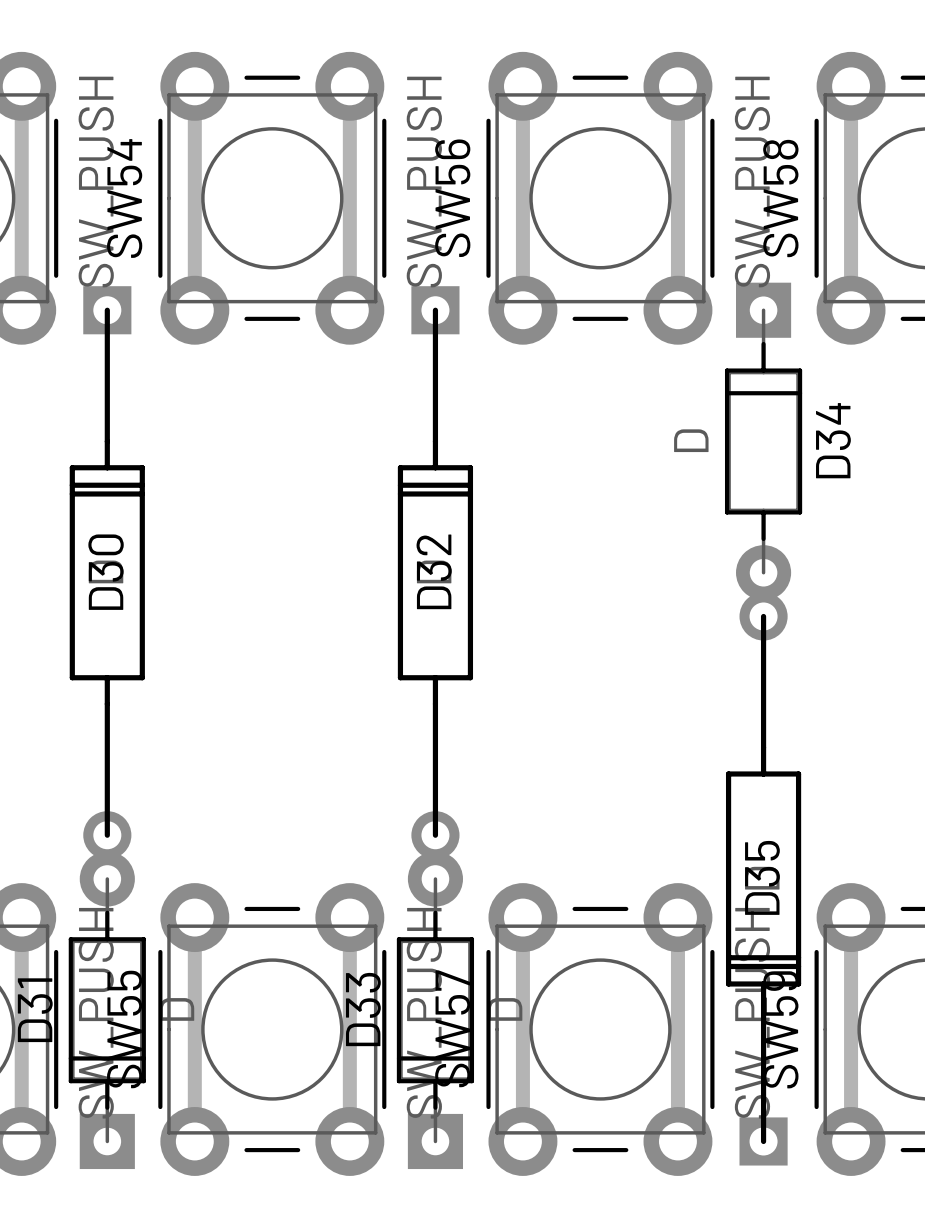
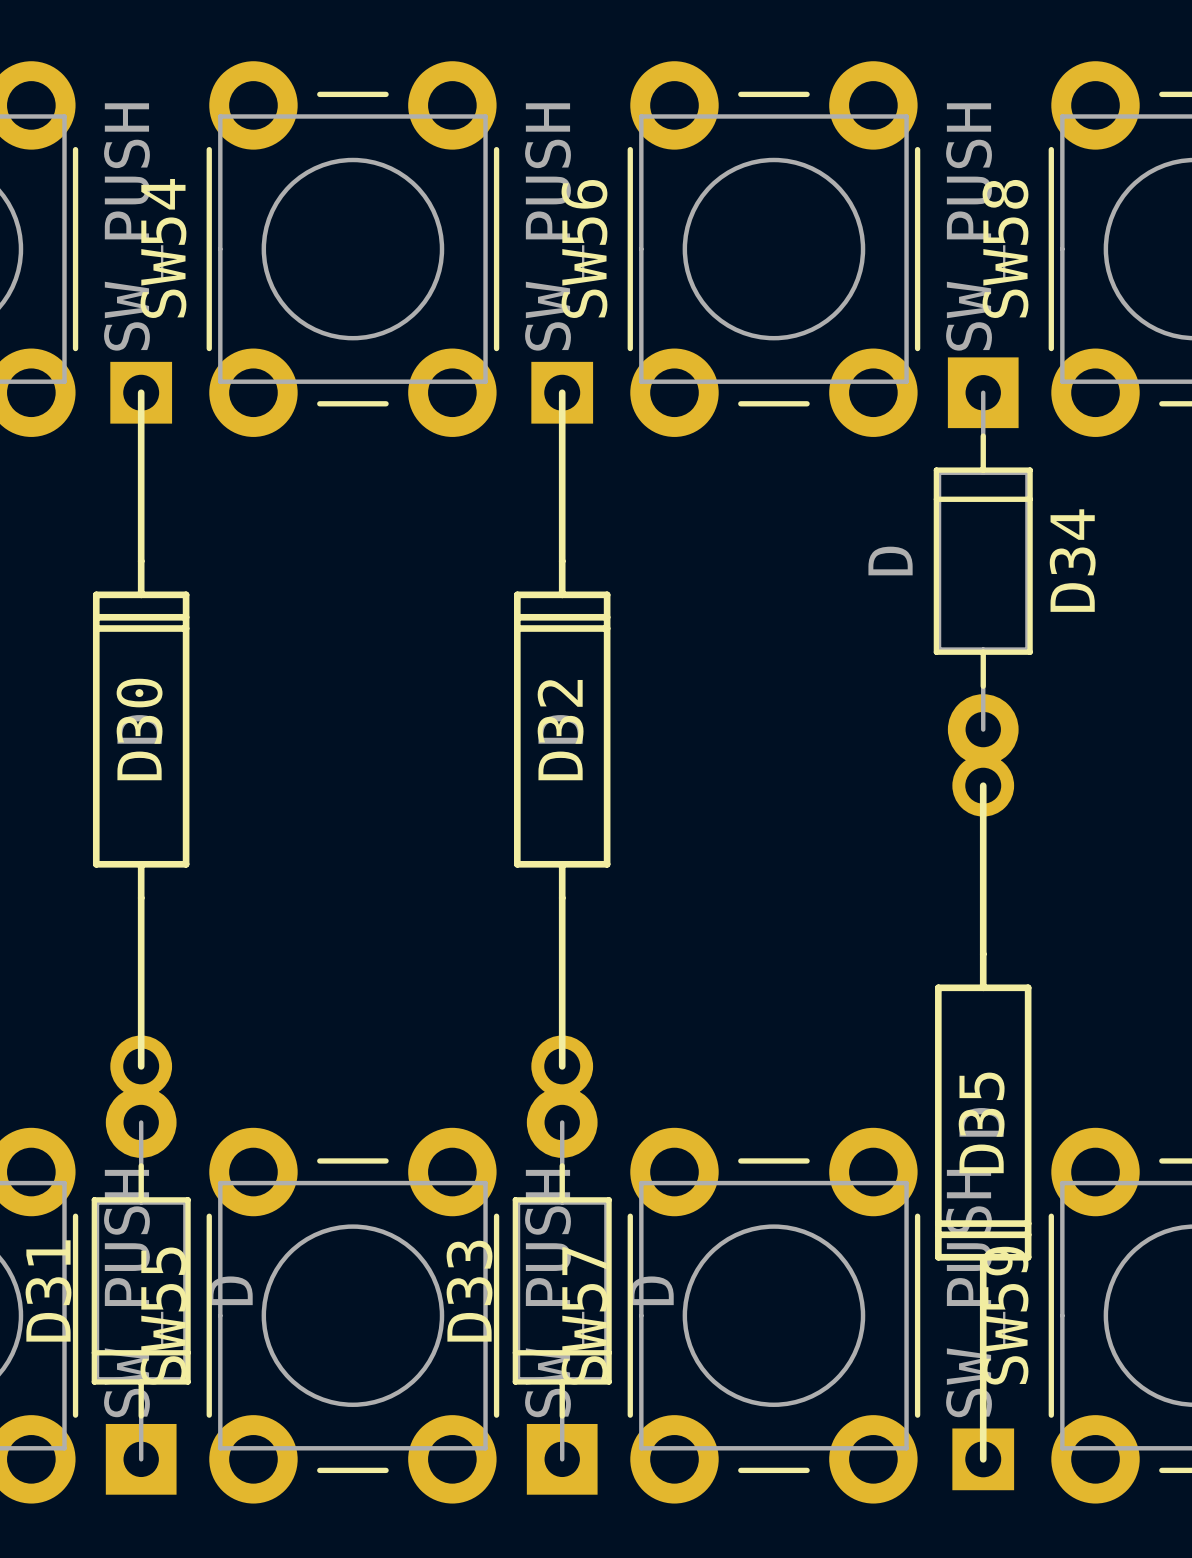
track: (21, 86) (21, 310) -> none
track: (194, 86) (194, 310) -> none
track: (349, 86) (349, 310) -> none
track: (522, 86) (522, 310) -> none
track: (677, 86) (677, 310) -> none
track: (851, 86) (851, 310) -> none
track: (21, 917) (21, 1141) -> none
track: (194, 917) (194, 1141) -> none
track: (349, 917) (349, 1141) -> none
track: (522, 917) (522, 1141) -> none
track: (677, 917) (677, 1141) -> none
track: (851, 917) (851, 1141) -> none

